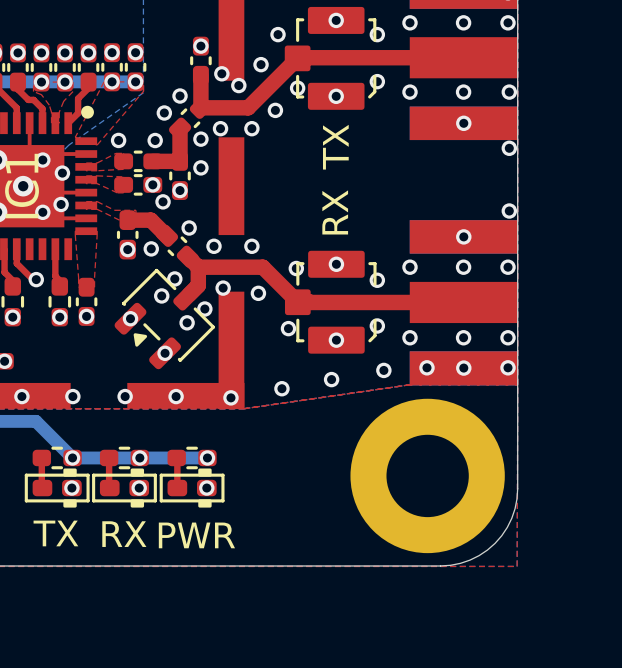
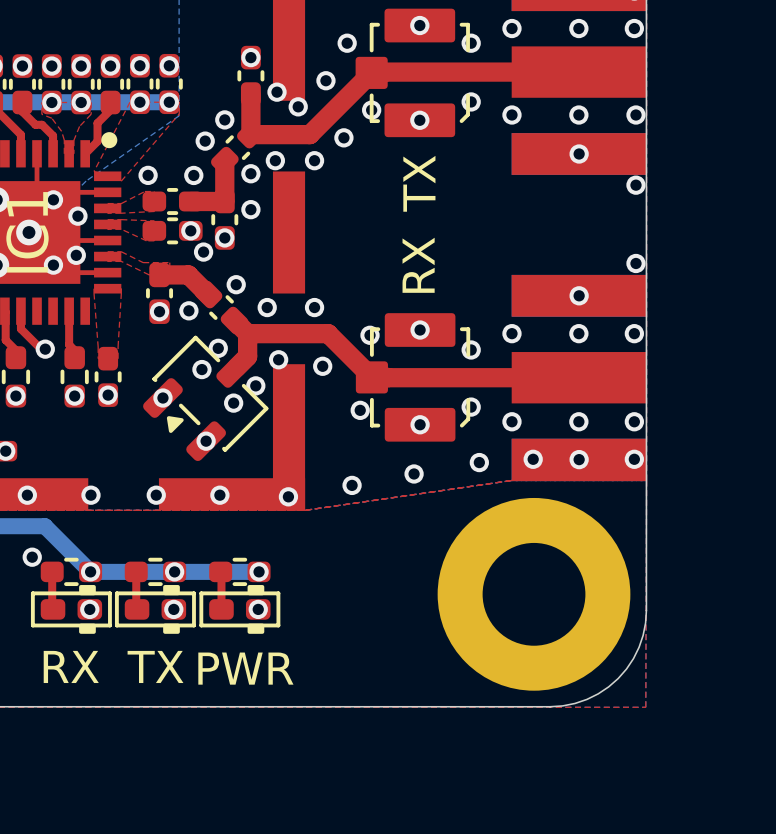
via: none -> (32, 557)
text: TX (55, 533) -> RX (71, 666)
text: RX (124, 534) -> TX (155, 666)

